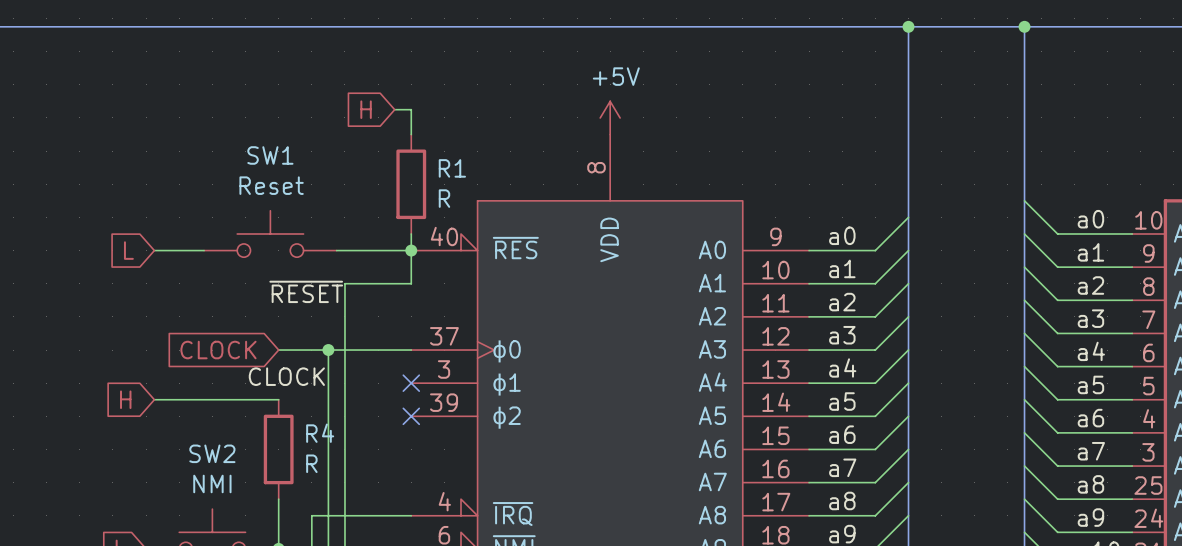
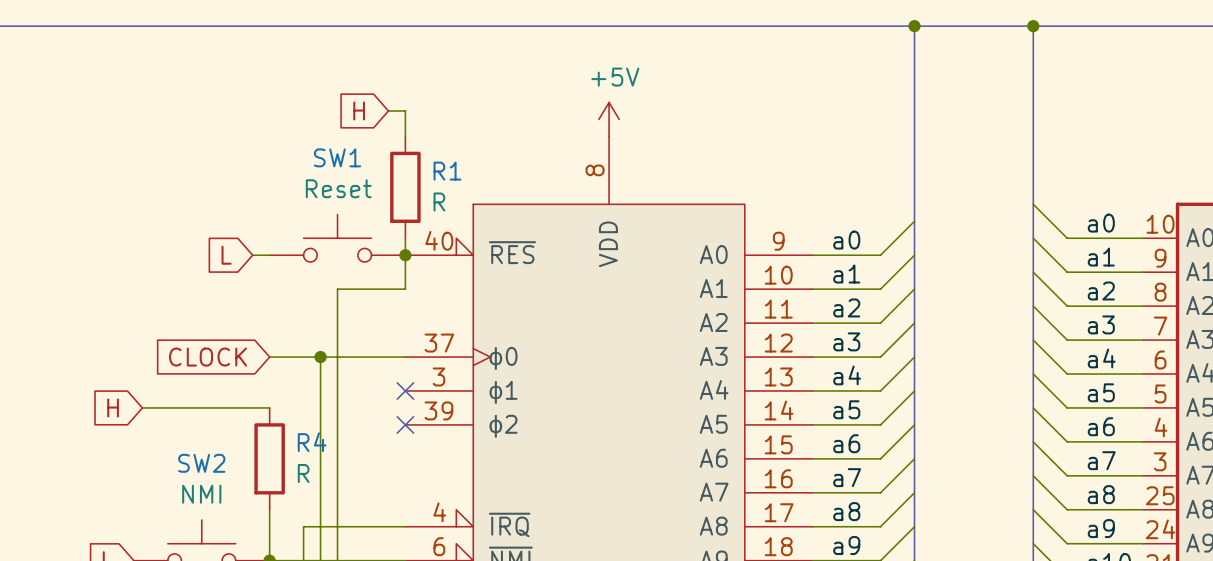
SW1 position: (270, 234) -> (337, 238)
global label position: L (128, 250) -> L (226, 255)
wire: (154, 250) (204, 250) -> none
wire: none -> (252, 255) (269, 255)
wire: (336, 250) (411, 250) -> none
label: ~{RESET} (306, 291) -> none
label: CLOCK (286, 376) -> none

